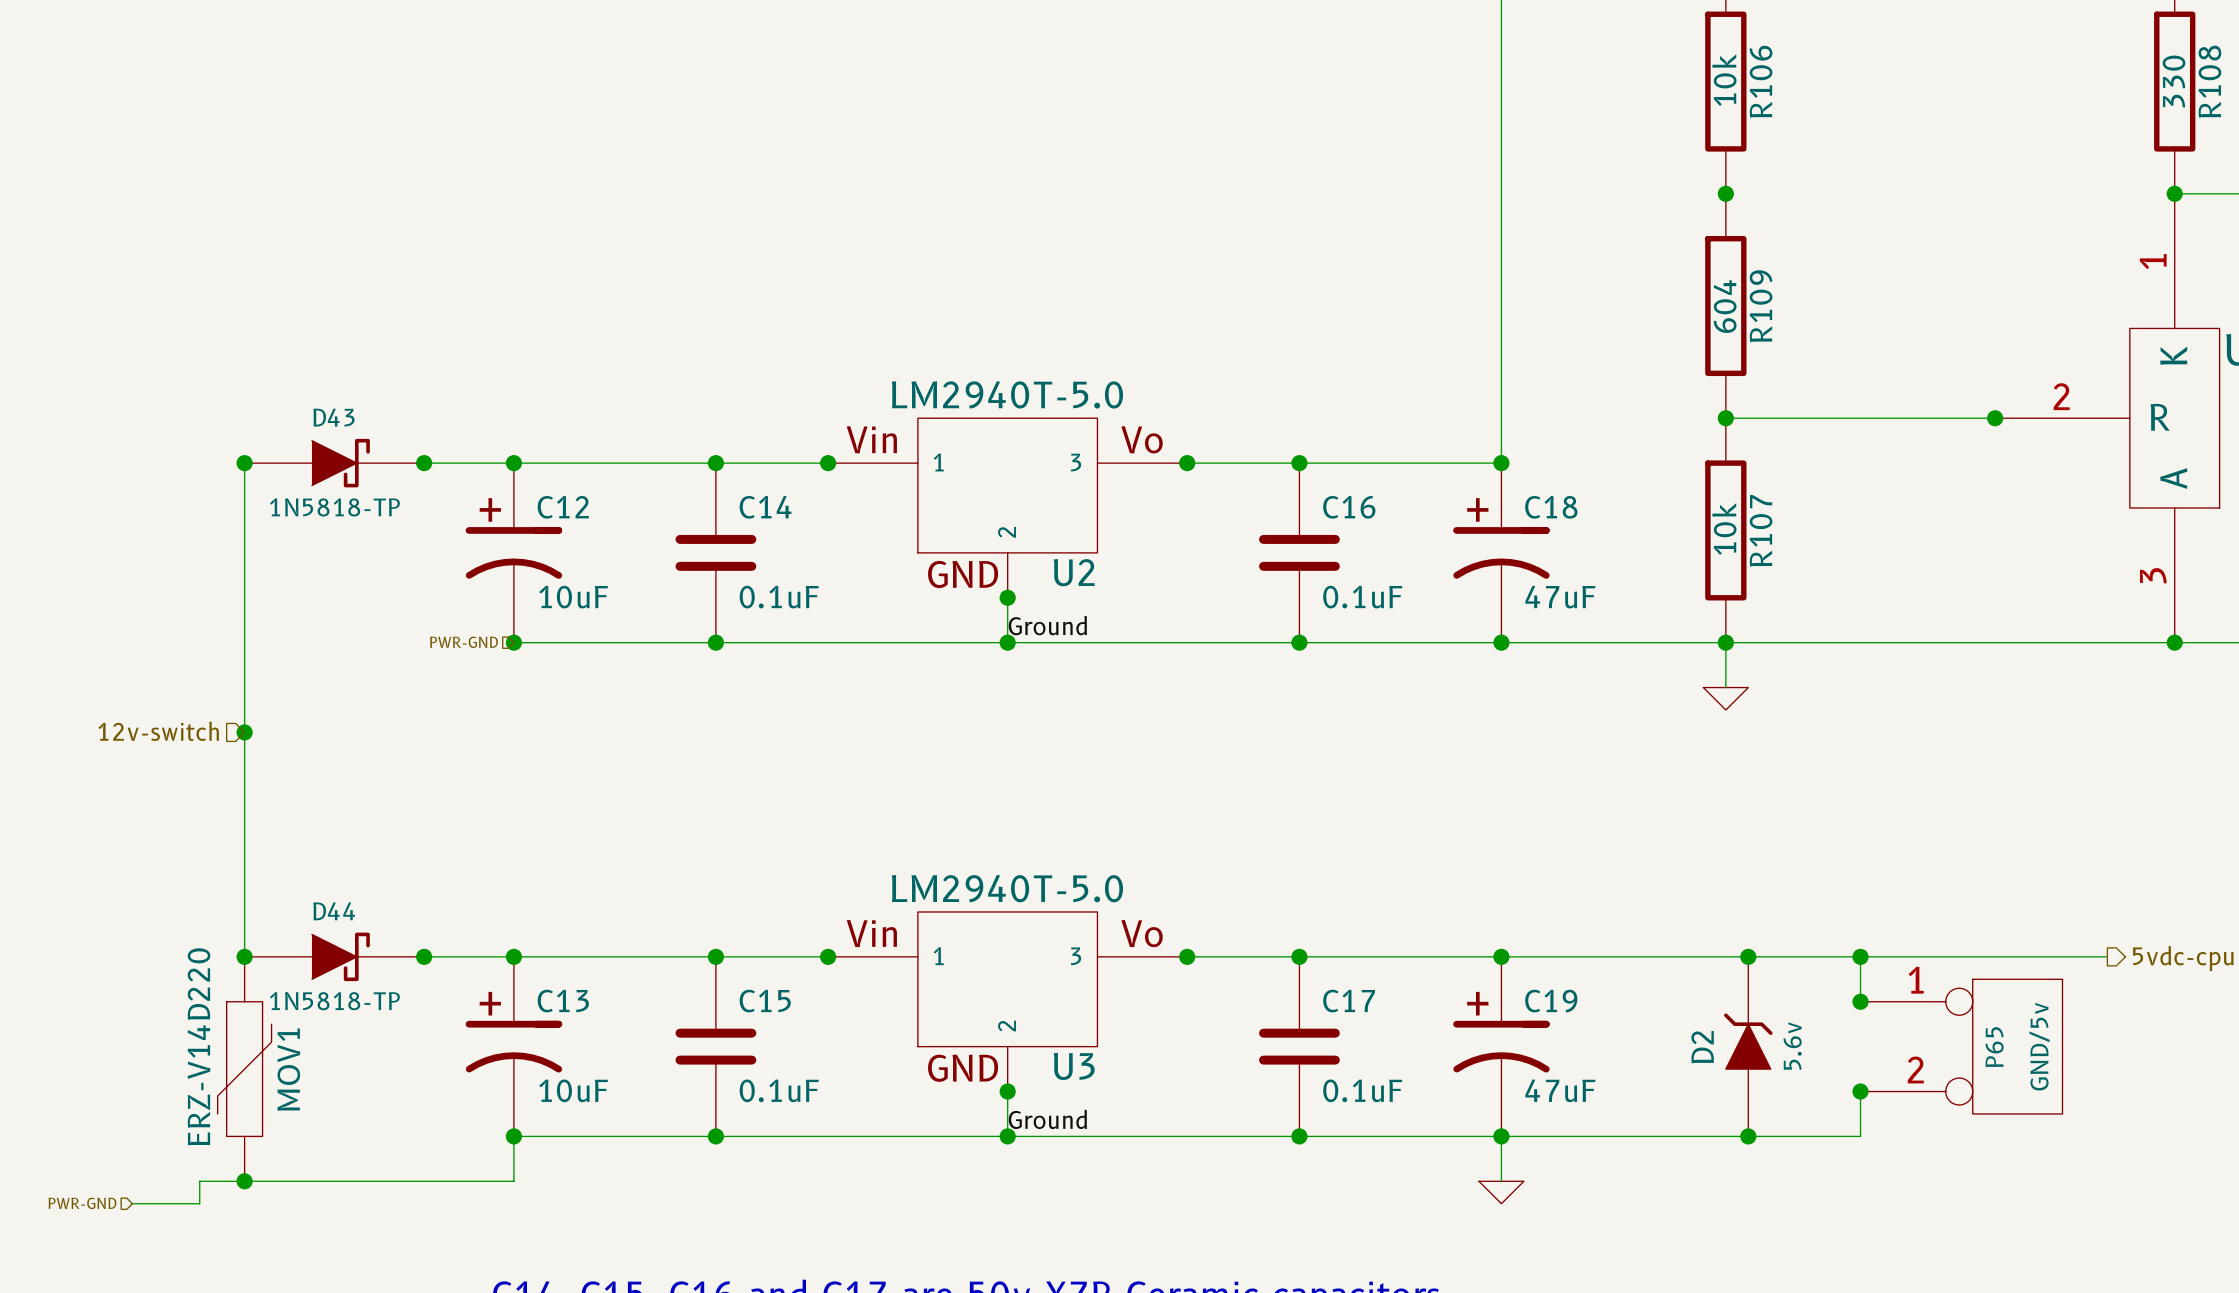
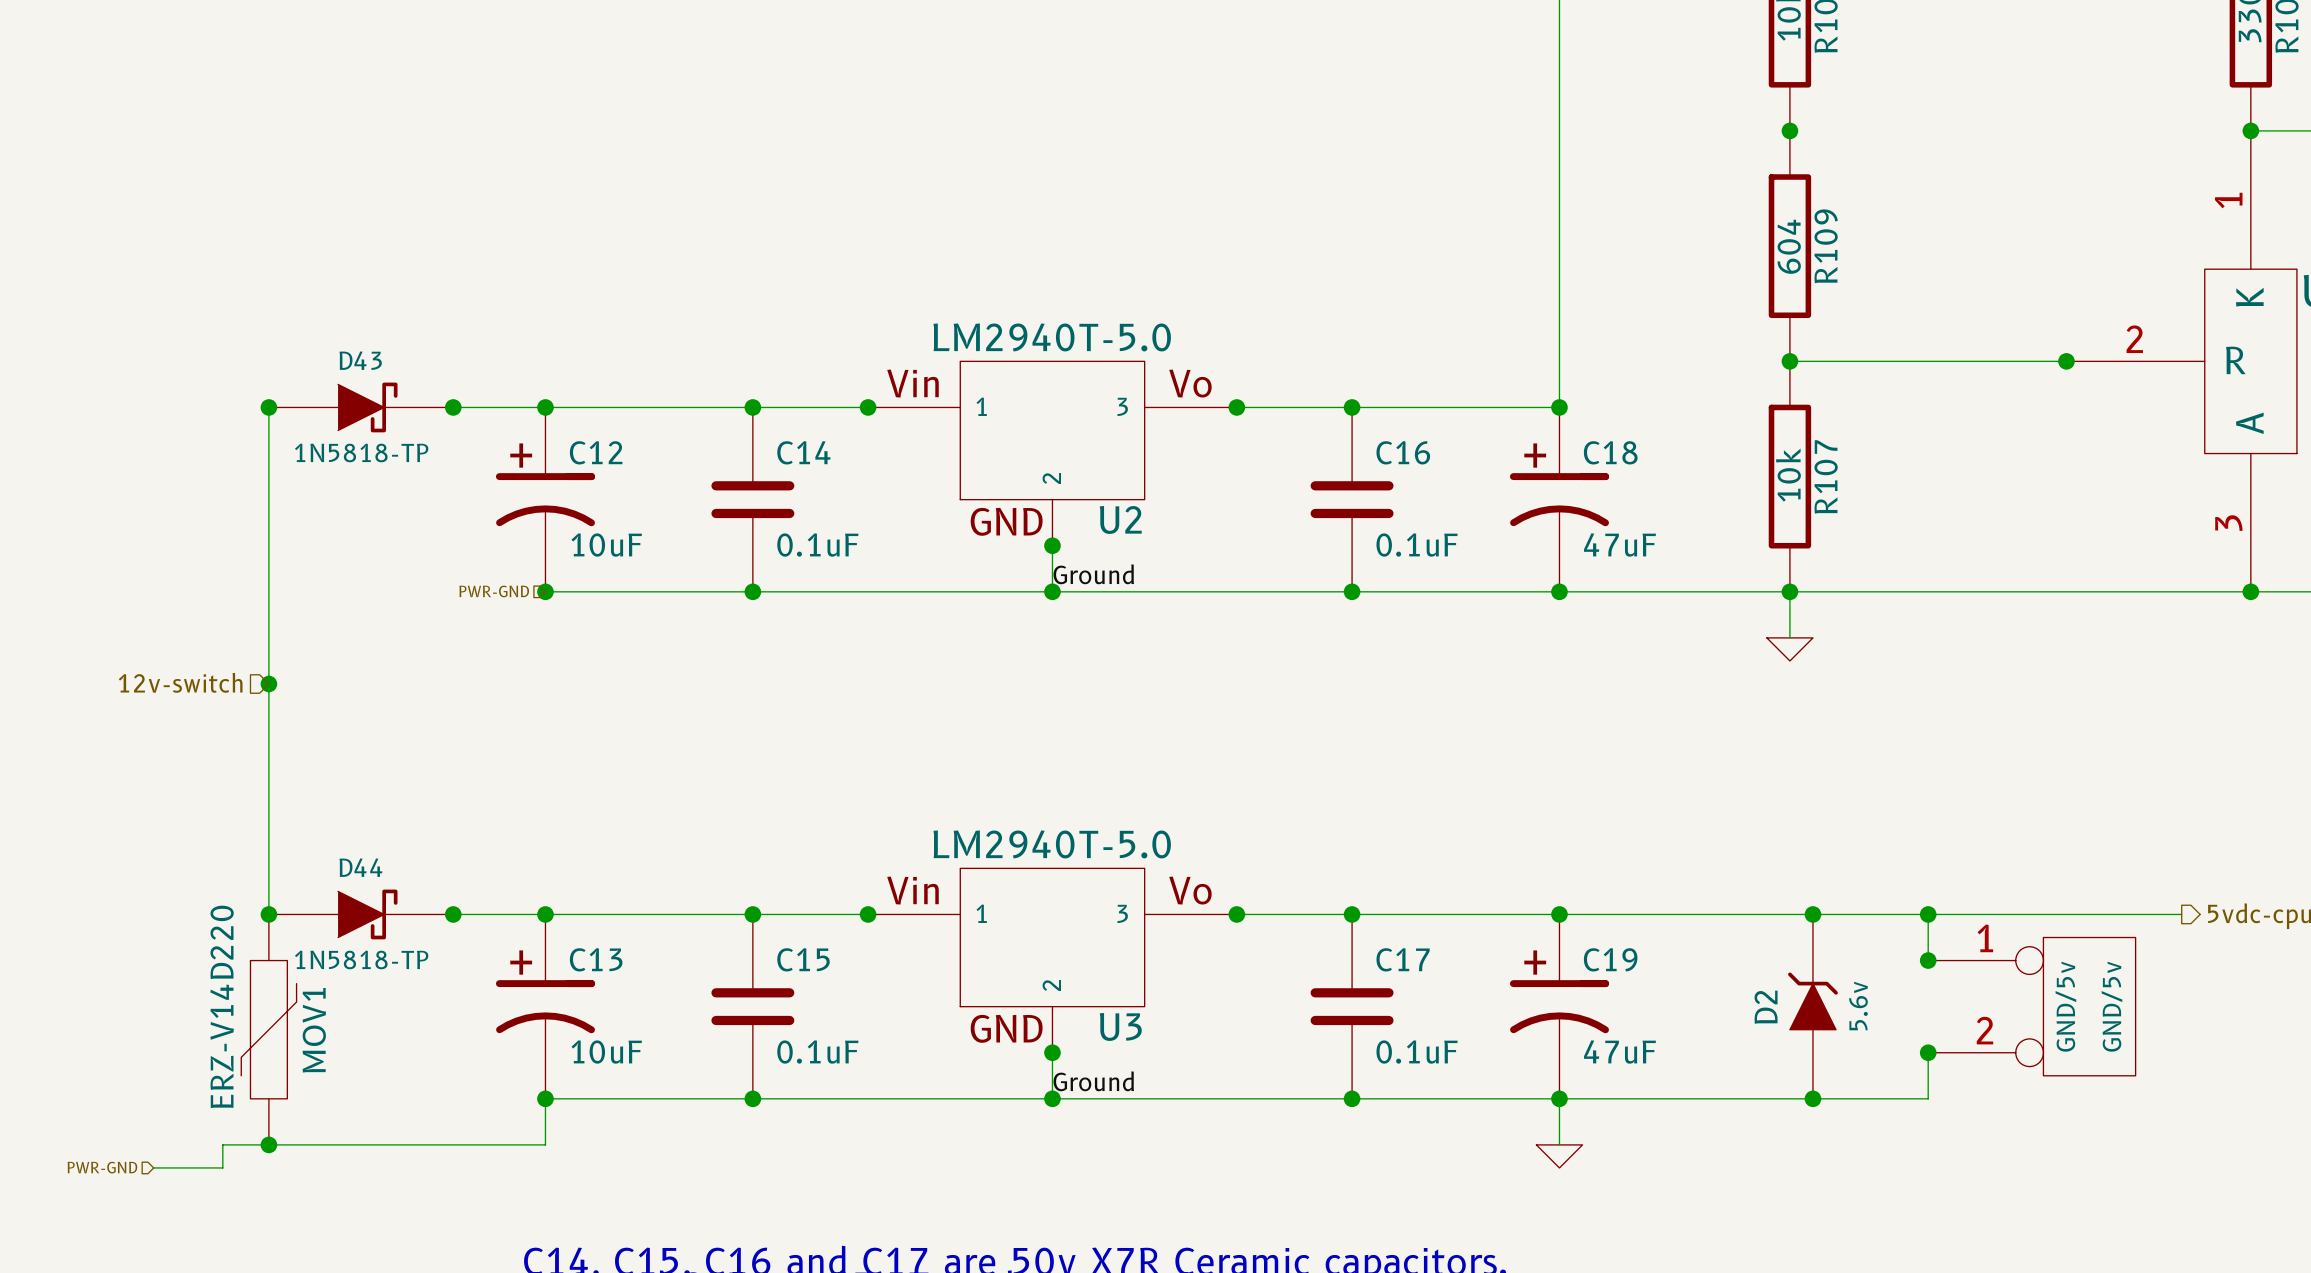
P65 name: P65 (1994, 1047) -> GND/5v (2065, 1006)

